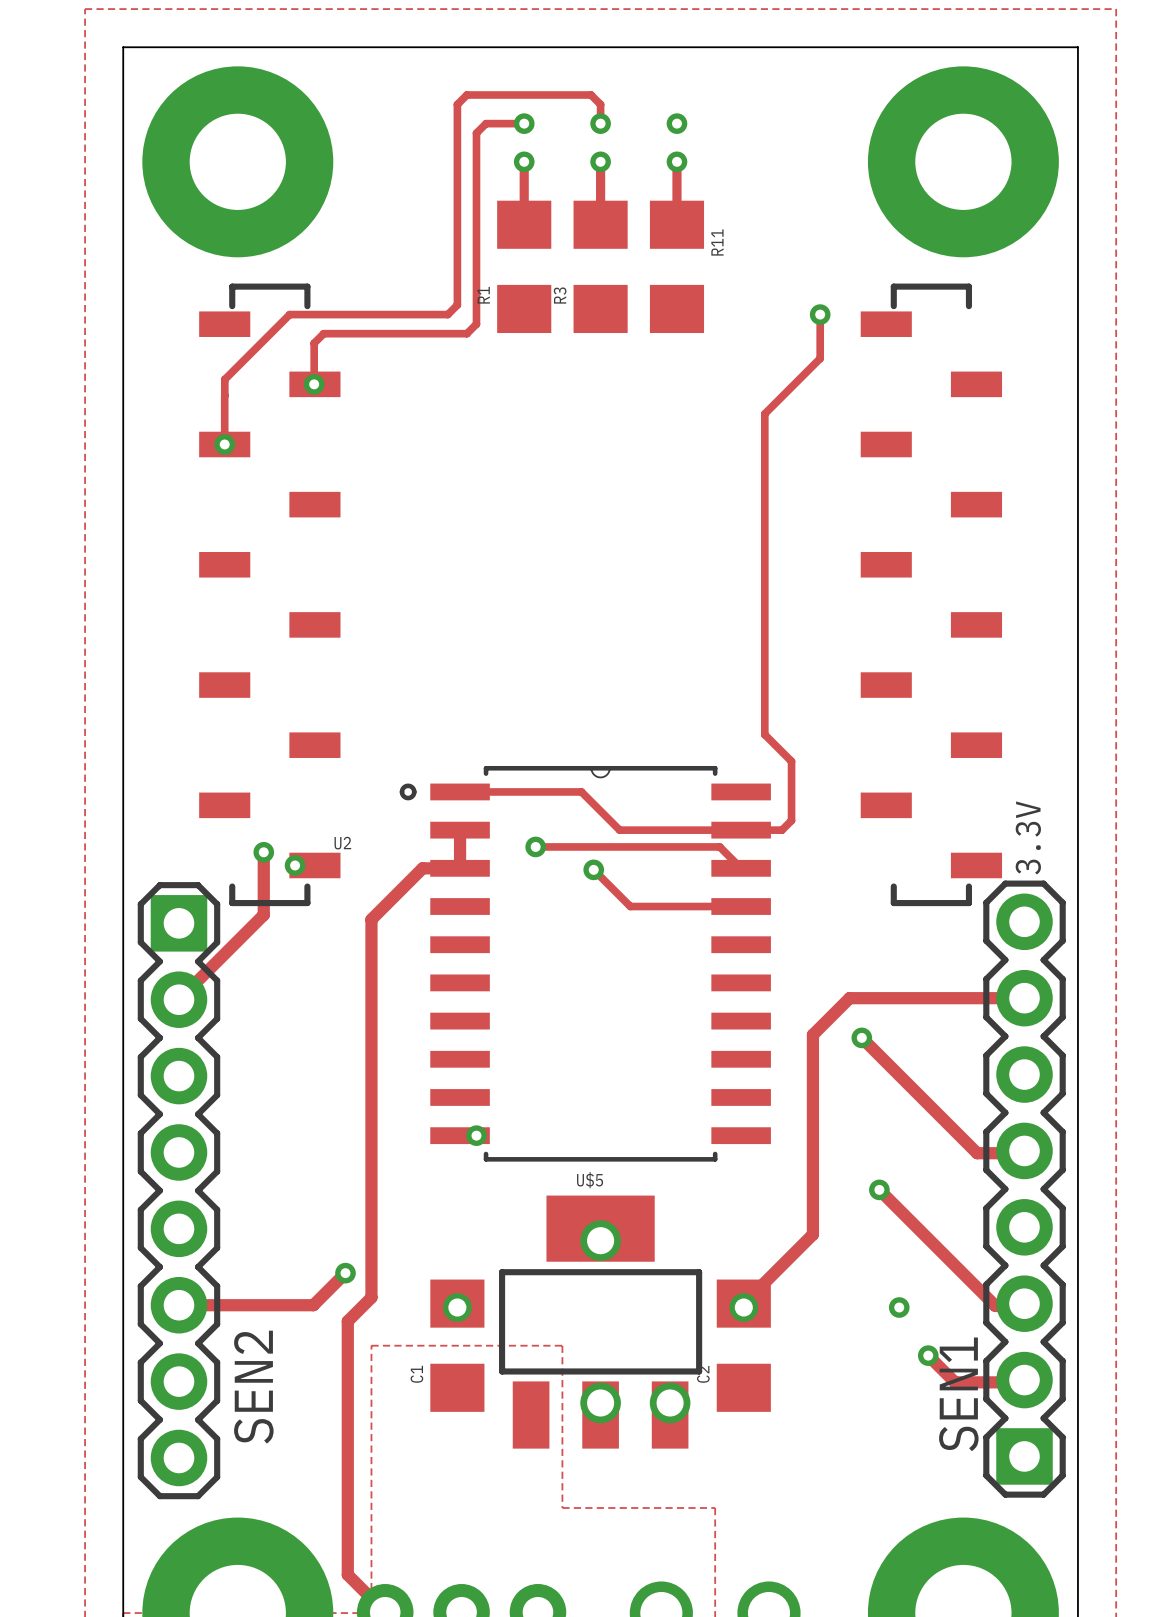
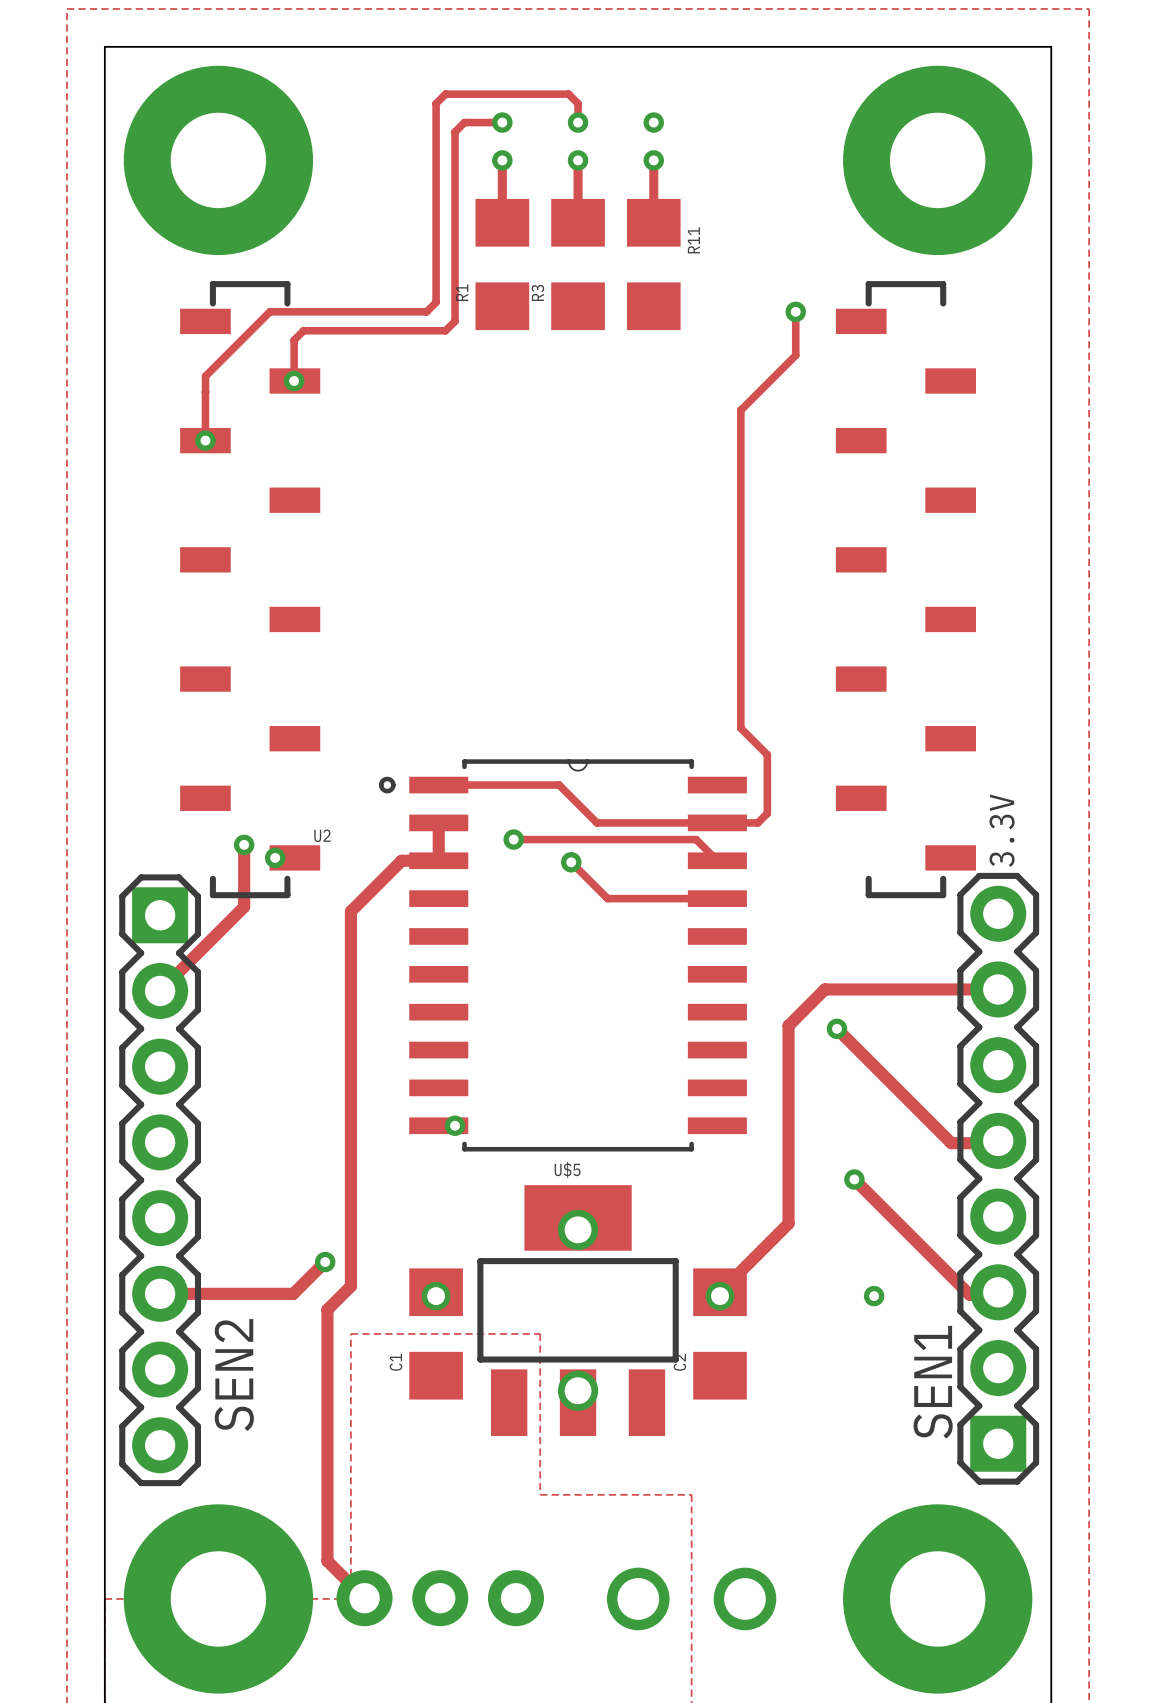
track: (928, 1355) (955, 1382) (1022, 1382) (1024, 1380) -> none
via: (928, 1355) -> none
via: (670, 1402) -> none

